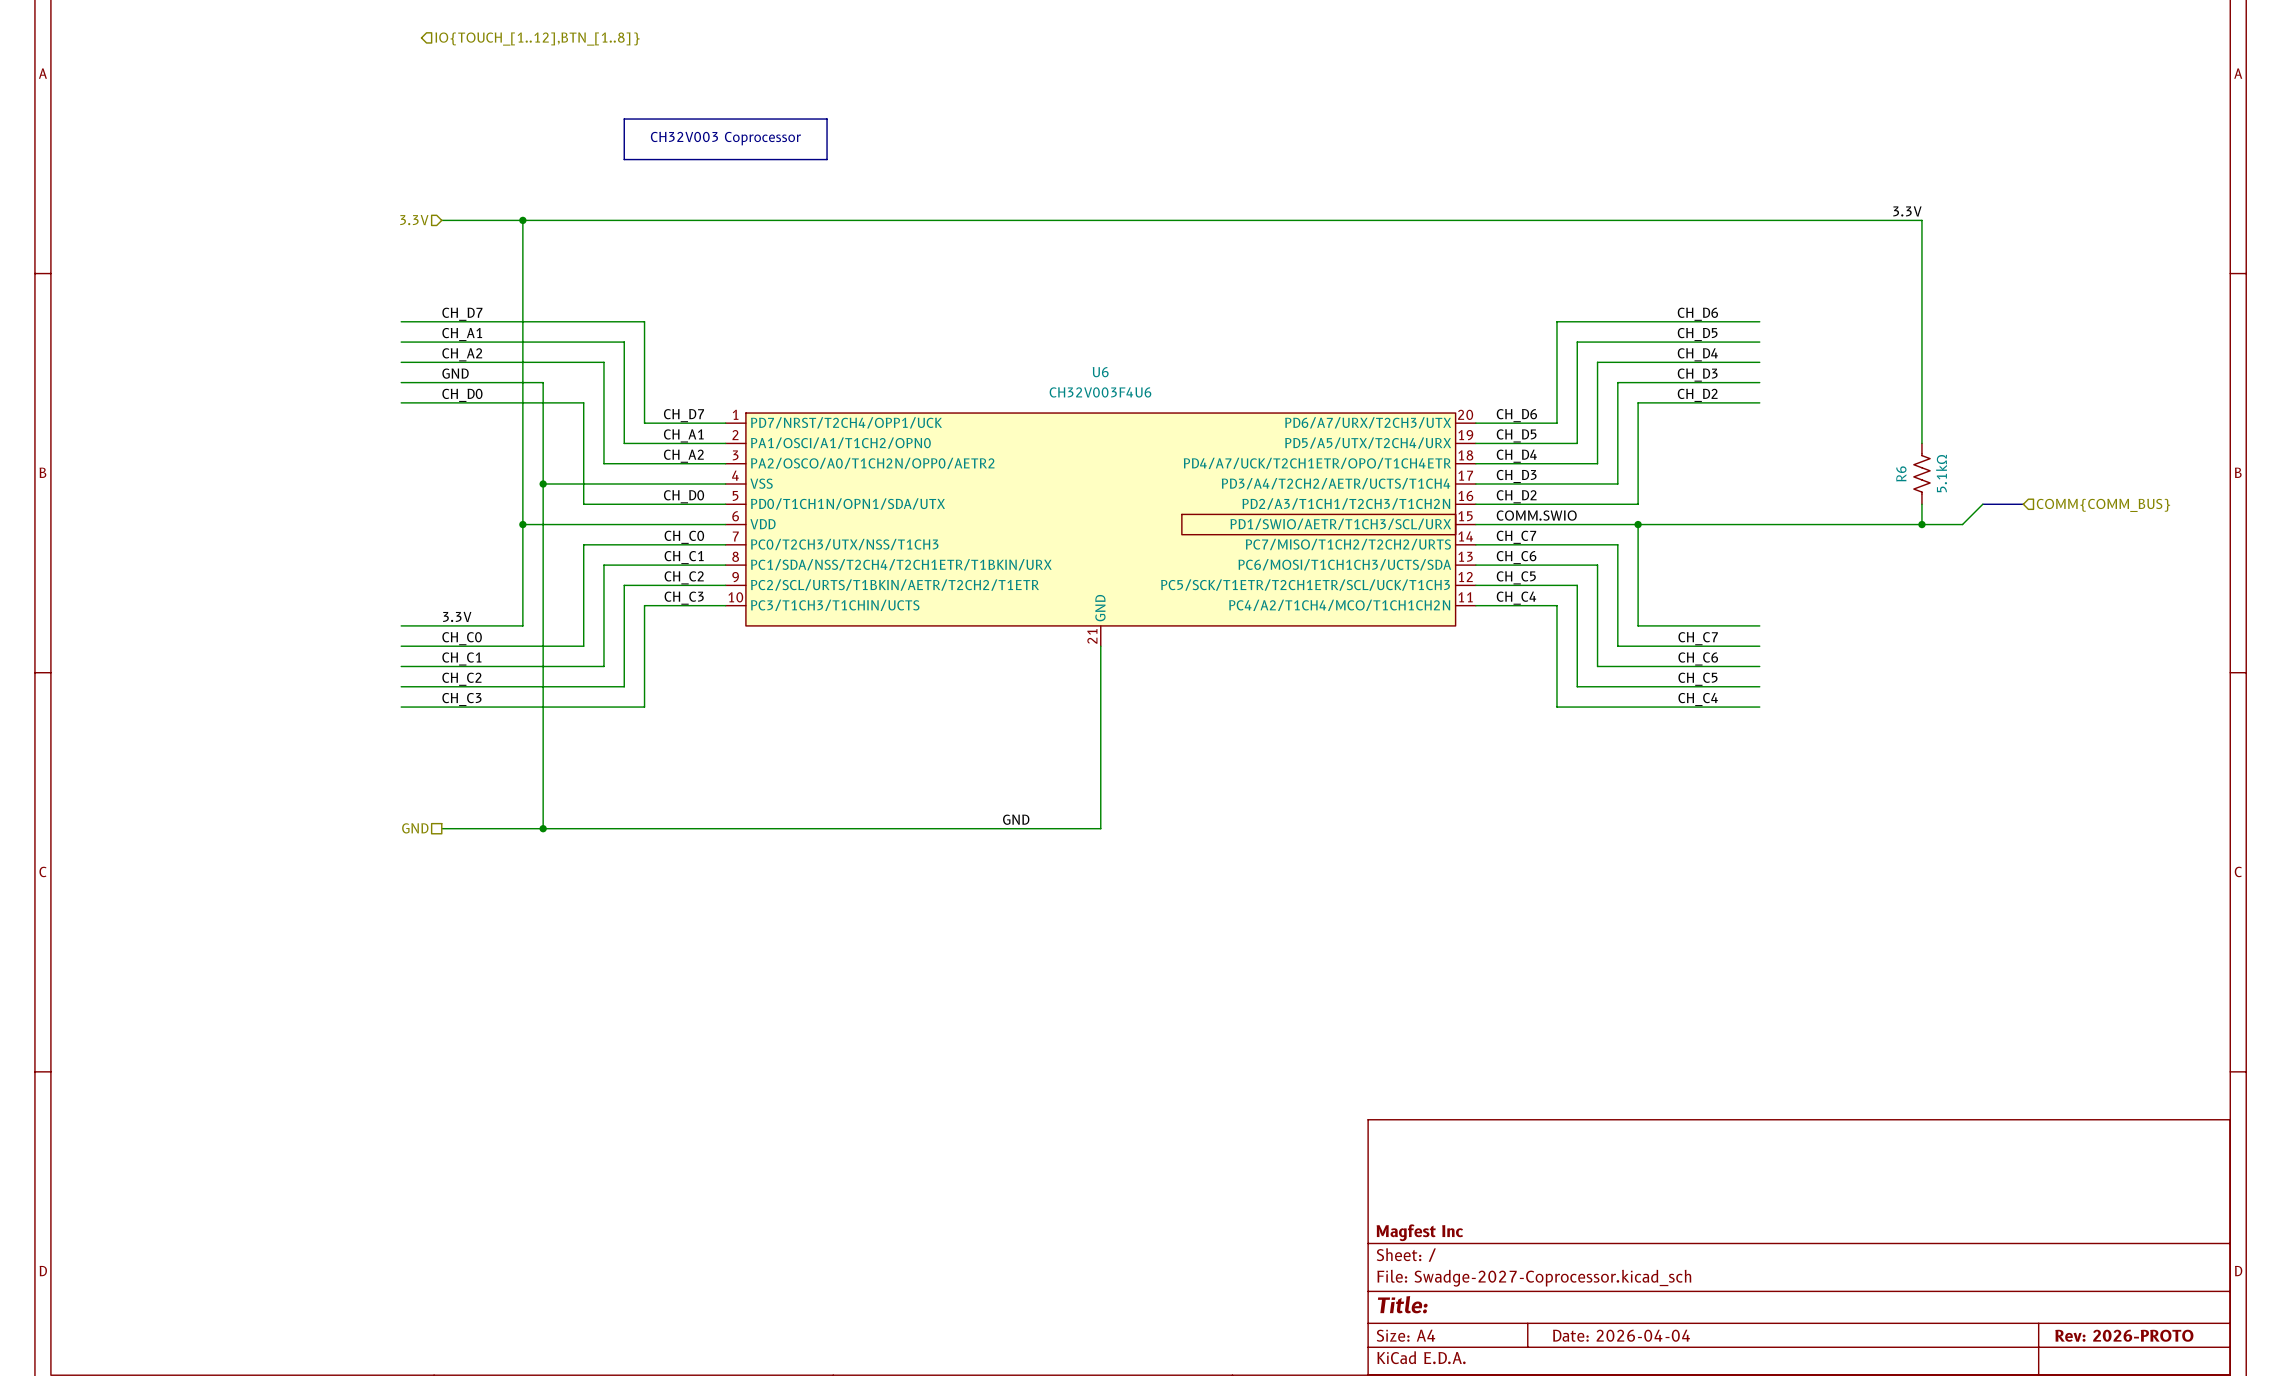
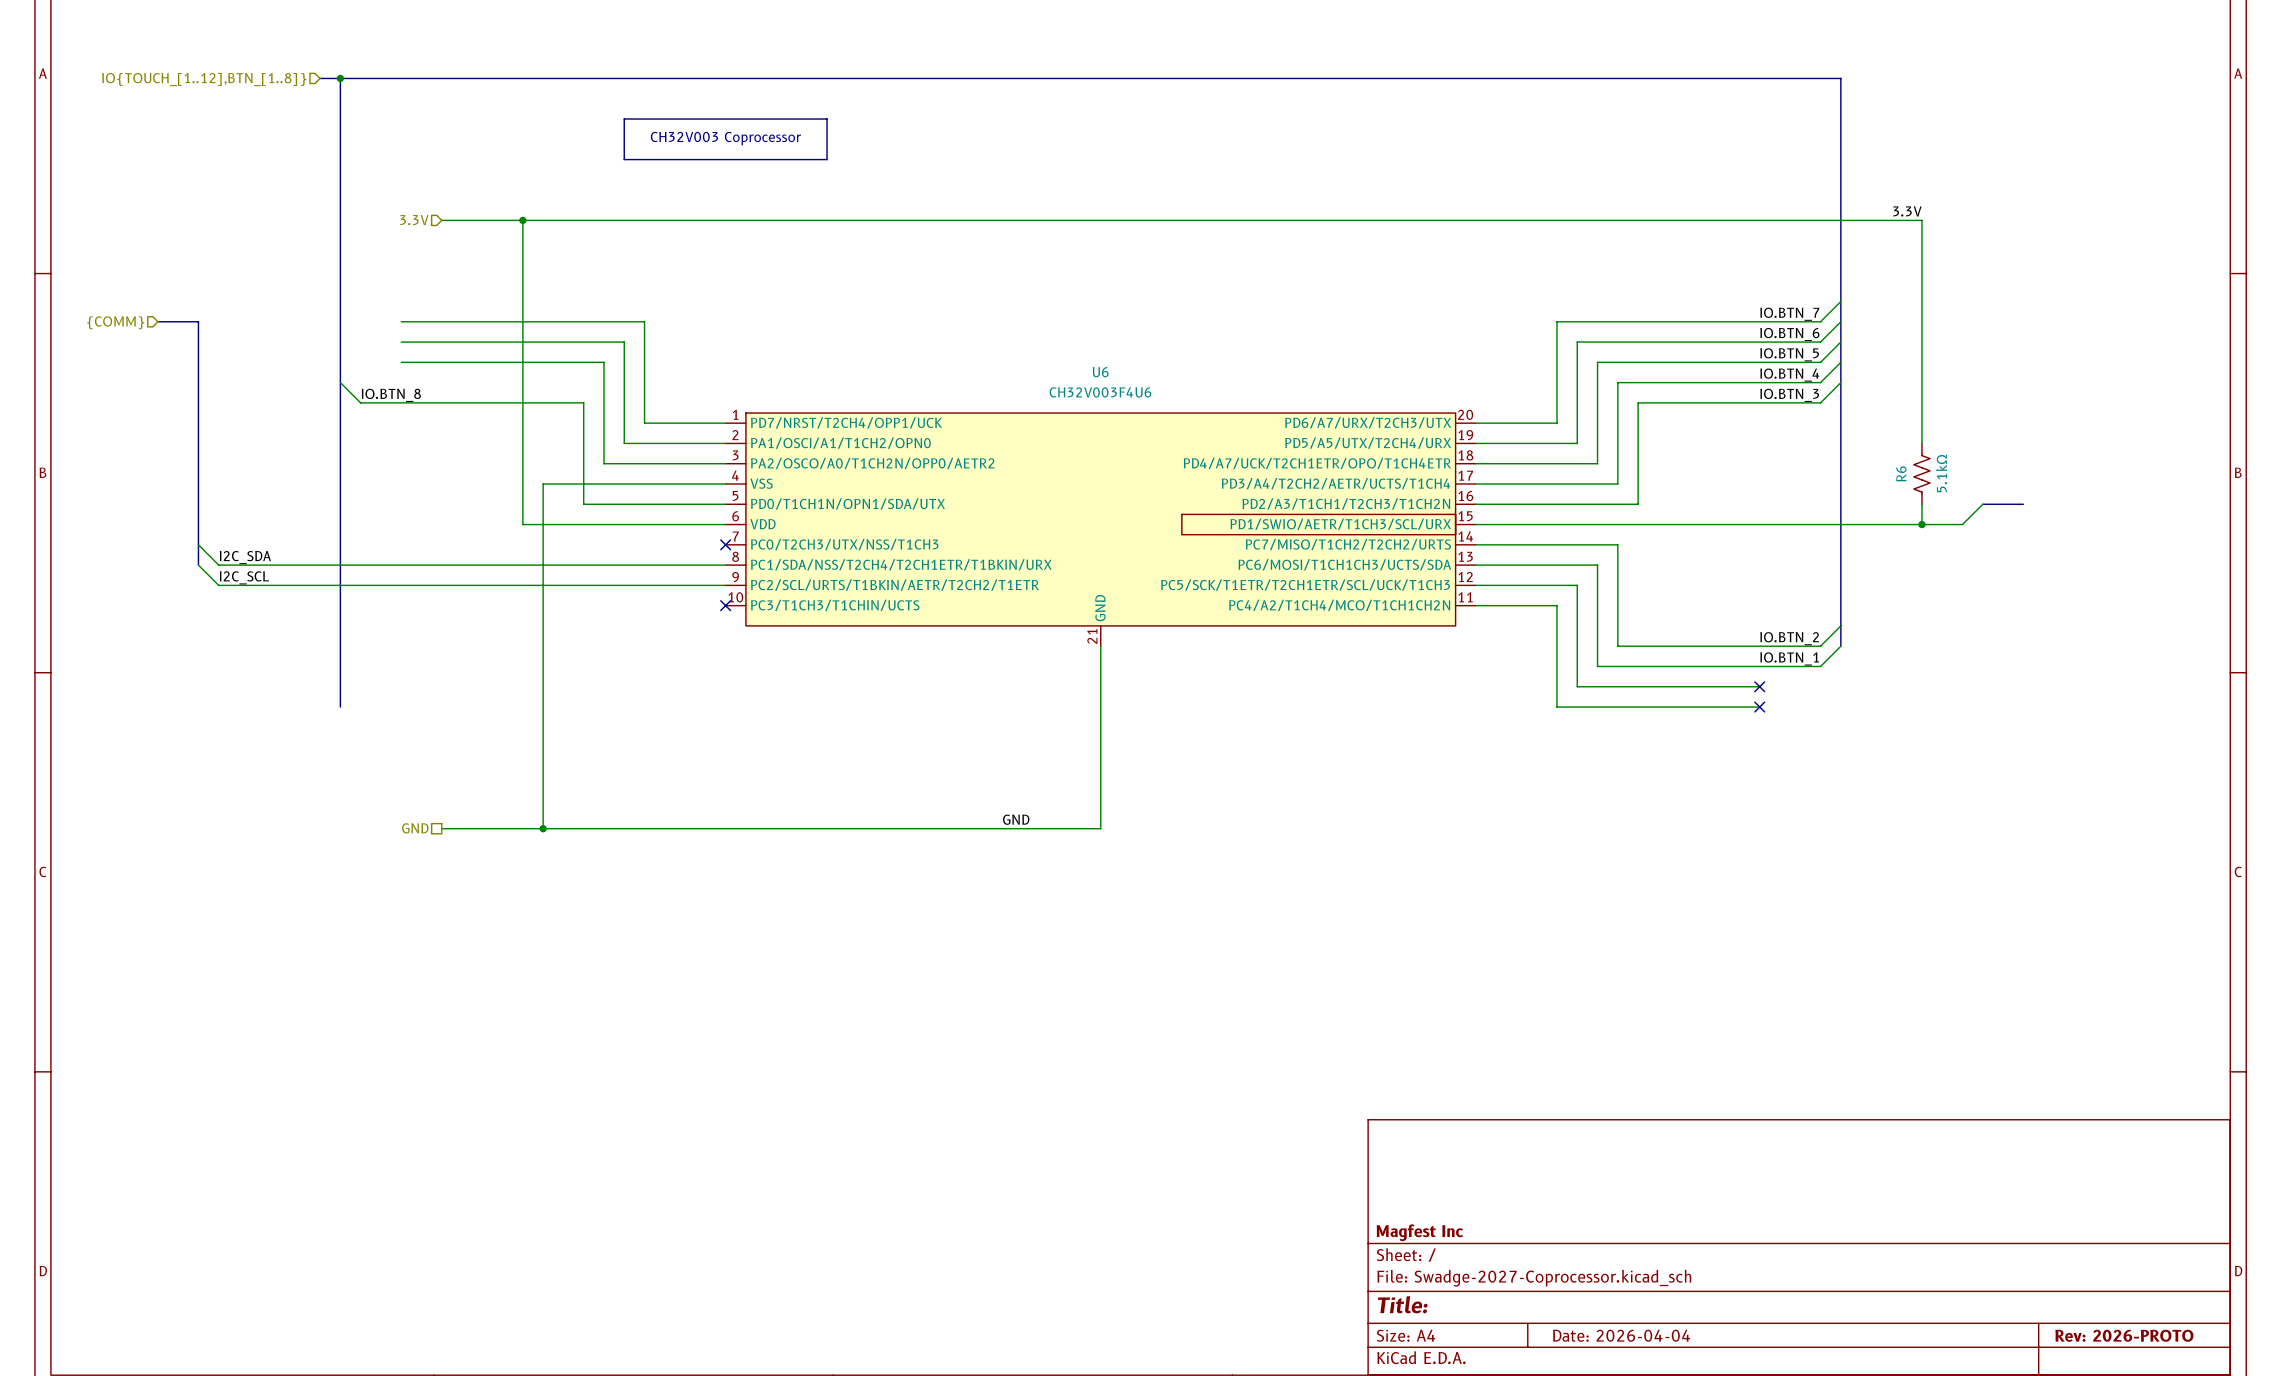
hierarchical label rotation: 0° (537, 39) -> 180° (204, 79)
hierarchical label position: IO{TOUCH_[1..12],BTN_[1..8]} (537, 39) -> IO{TOUCH_[1..12],BTN_[1..8]} (204, 79)
bus: none -> (320, 78) (1840, 78) (1840, 646)
bus: none -> (340, 78) (340, 707)
junction: none -> (340, 78)
wire: none -> (1840, 301) (1820, 321) (1759, 321)
label: CH_D7 (462, 314) -> none
label: CH_D6 (1697, 314) -> none
label: none -> IO.BTN_7 (1789, 314)
bus: none -> (157, 321) (198, 321) (198, 565)
wire: none -> (1840, 321) (1820, 342) (1759, 342)
hierarchical label: none -> {COMM} (115, 322)
label: CH_A1 (462, 334) -> none
label: CH_D5 (1697, 334) -> none
label: none -> IO.BTN_6 (1789, 334)
wire: none -> (1840, 342) (1820, 362) (1759, 362)
label: CH_A2 (462, 354) -> none
label: CH_D4 (1697, 354) -> none
label: none -> IO.BTN_5 (1789, 354)
wire: none -> (1840, 362) (1820, 382) (1759, 382)
label: GND (455, 373) -> none
label: CH_D3 (1697, 375) -> none
label: none -> IO.BTN_4 (1789, 375)
wire: none -> (340, 382) (360, 402) (401, 402)
wire: (401, 382) (543, 382) (543, 483) -> none
wire: none -> (1840, 382) (1820, 402) (1759, 402)
label: none -> IO.BTN_8 (391, 395)
label: CH_D0 (462, 395) -> none
label: CH_D2 (1697, 395) -> none
label: none -> IO.BTN_3 (1789, 395)
label: CH_D7 (683, 415) -> none
label: CH_D6 (1516, 415) -> none
label: CH_A1 (683, 435) -> none
label: CH_D5 (1516, 435) -> none
label: CH_A2 (683, 456) -> none
label: CH_D4 (1516, 456) -> none
label: CH_D3 (1516, 476) -> none
junction: (543, 483) -> none
label: CH_D0 (684, 496) -> none
label: CH_D2 (1516, 496) -> none
hierarchical label: COMM{COMM_BUS} (2103, 505) -> none
label: COMM.SWIO (1536, 515) -> none
wire: (522, 524) (522, 625) (401, 625) -> none
junction: (522, 524) -> none
wire: (1638, 524) (1638, 625) (1759, 625) -> none
junction: (1638, 524) -> none
label: CH_C0 (684, 537) -> none
label: CH_C7 (1516, 537) -> none
wire: (725, 544) (583, 544) (583, 646) (401, 646) -> none
no-connect mark: none -> (725, 544)
label: none -> I2C_SDA (245, 557)
label: CH_C1 (684, 557) -> none
label: CH_C6 (1516, 557) -> none
wire: (603, 565) (603, 666) (401, 666) -> (603, 565) (218, 565) (198, 544)
label: none -> I2C_SCL (244, 577)
label: CH_C2 (684, 577) -> none
label: CH_C5 (1516, 577) -> none
wire: (624, 585) (624, 686) (401, 686) -> (624, 585) (218, 585) (198, 565)
label: CH_C3 (684, 598) -> none
label: CH_C4 (1516, 598) -> none
wire: (725, 605) (644, 605) (644, 707) (401, 707) -> none
no-connect mark: none -> (725, 605)
label: 3.3V (457, 616) -> none
wire: none -> (1840, 625) (1820, 646) (1759, 646)
label: CH_C0 (462, 638) -> none
label: CH_C7 (1698, 638) -> none
label: none -> IO.BTN_2 (1789, 638)
wire: none -> (1840, 646) (1820, 666) (1759, 666)
label: CH_C1 (461, 658) -> none
label: CH_C6 (1698, 658) -> none
label: none -> IO.BTN_1 (1789, 658)
label: CH_C2 (461, 679) -> none
label: CH_C5 (1697, 679) -> none
no-connect mark: none -> (1759, 686)
label: CH_C3 (461, 699) -> none
label: CH_C4 (1698, 699) -> none
no-connect mark: none -> (1759, 707)

